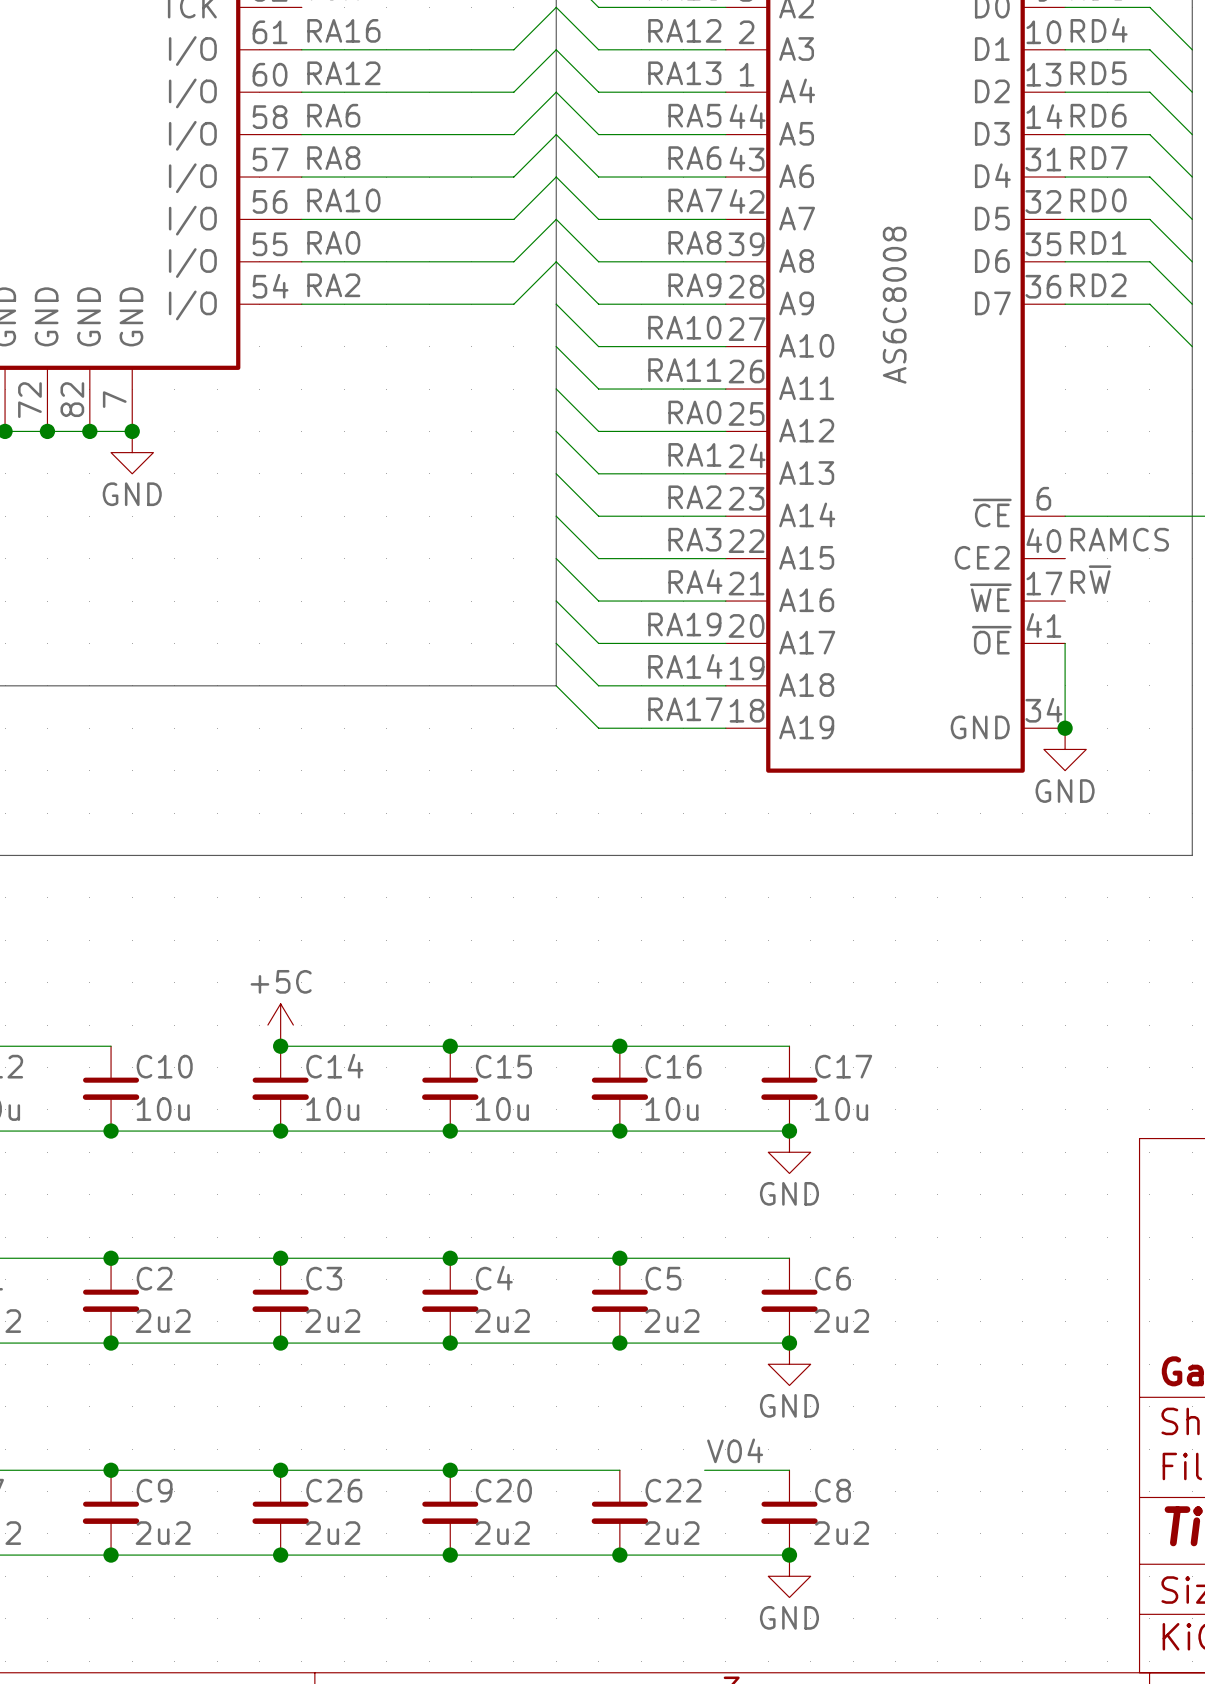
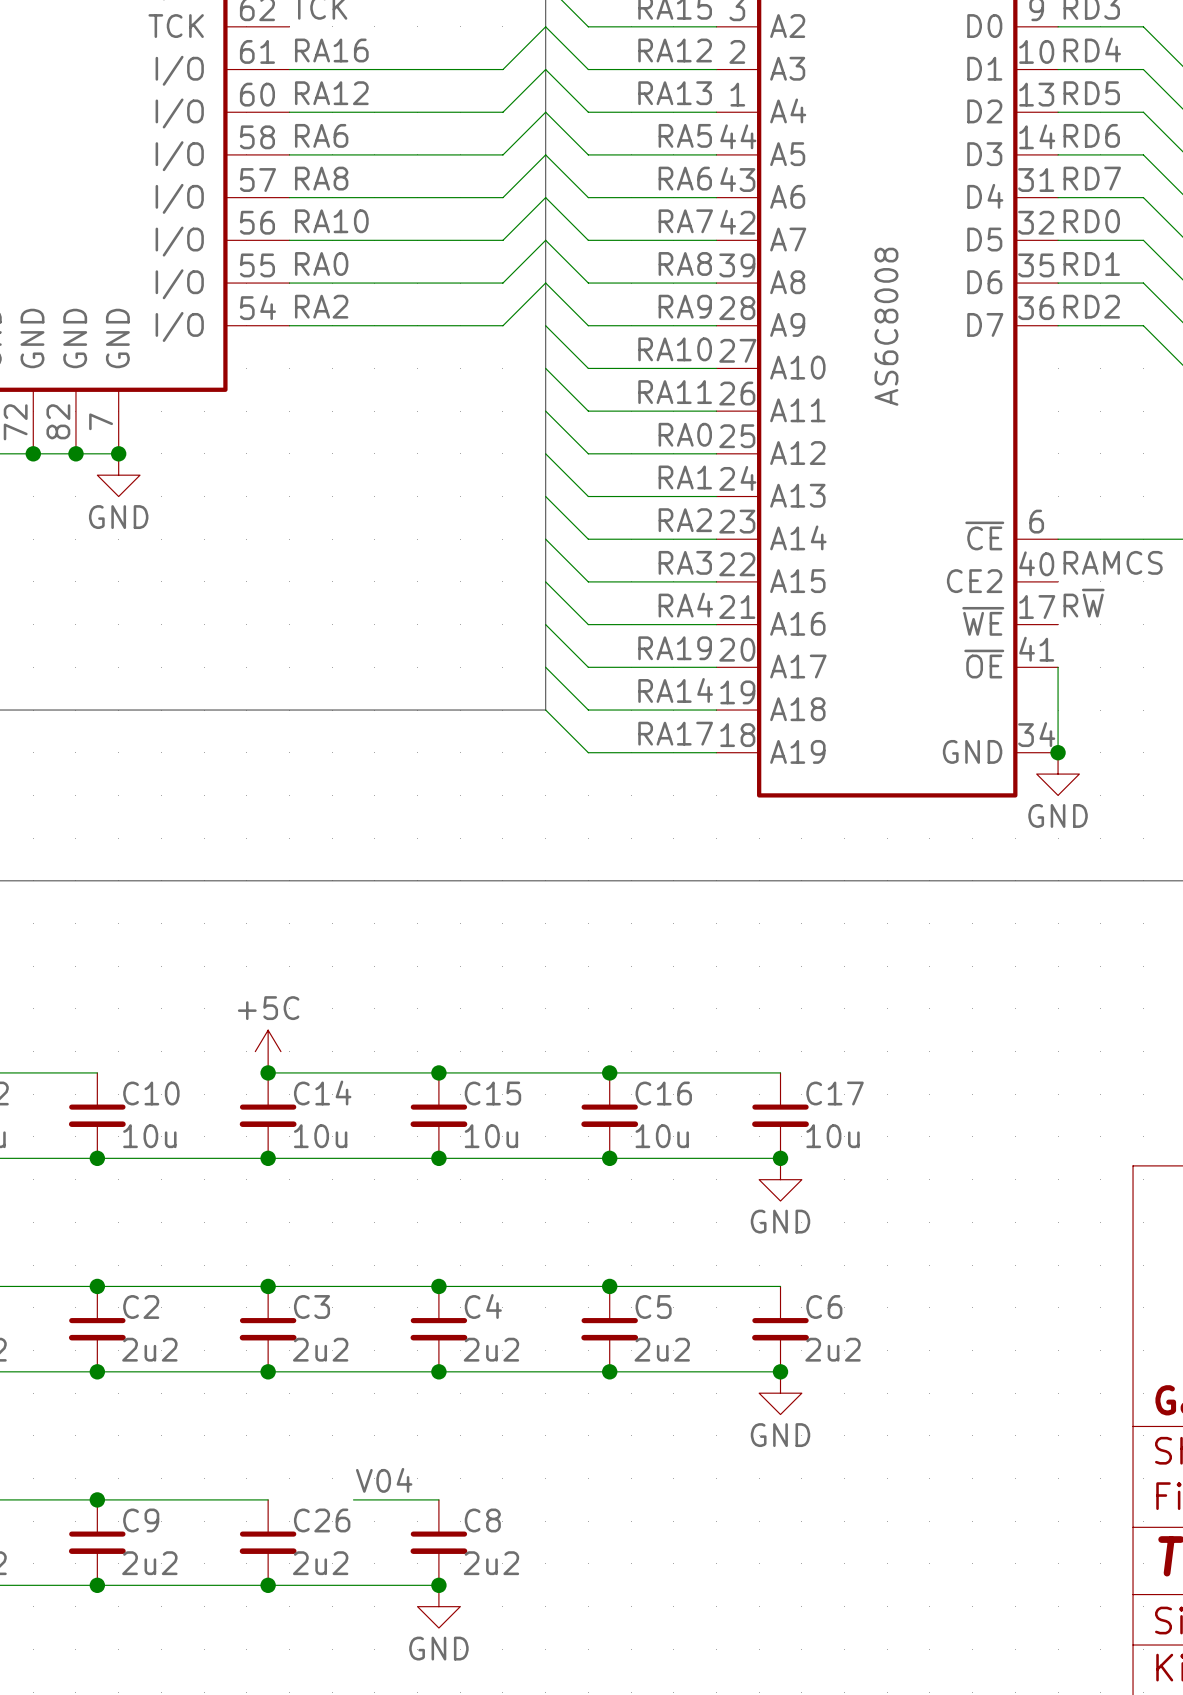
label position: V04 (735, 1450) -> V04 (384, 1480)
wire: (280, 1470) (365, 1470) -> none
junction: (280, 1470) -> none
wire: (450, 1470) (619, 1470) -> none
junction: (450, 1470) -> none
wire: (704, 1470) (789, 1470) -> none
C20 name: C20 (503, 1490) -> C8 (482, 1520)
C22: 2u2 (619, 1512) -> none
C8: 2u2 (789, 1512) -> none
wire: (450, 1555) (789, 1555) -> none
junction: (619, 1555) -> none
junction: (789, 1555) -> none
power symbol position: GND (789, 1576) -> GND (438, 1606)

